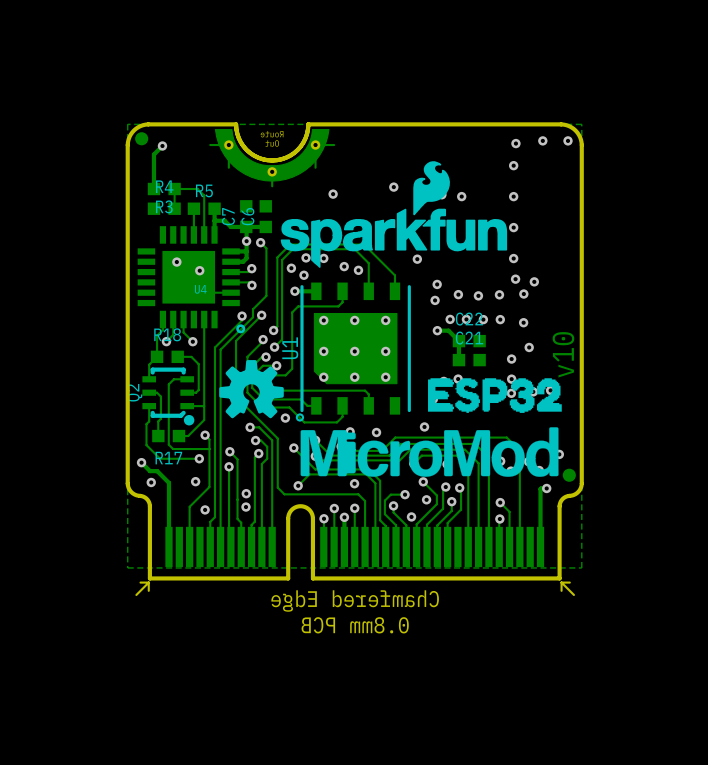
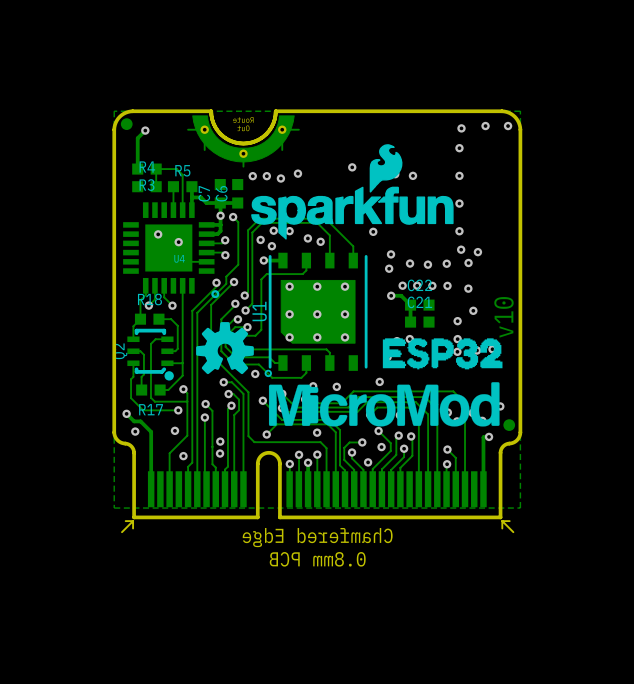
via: none -> (252, 176)
via: none -> (266, 176)
via: none -> (280, 178)

